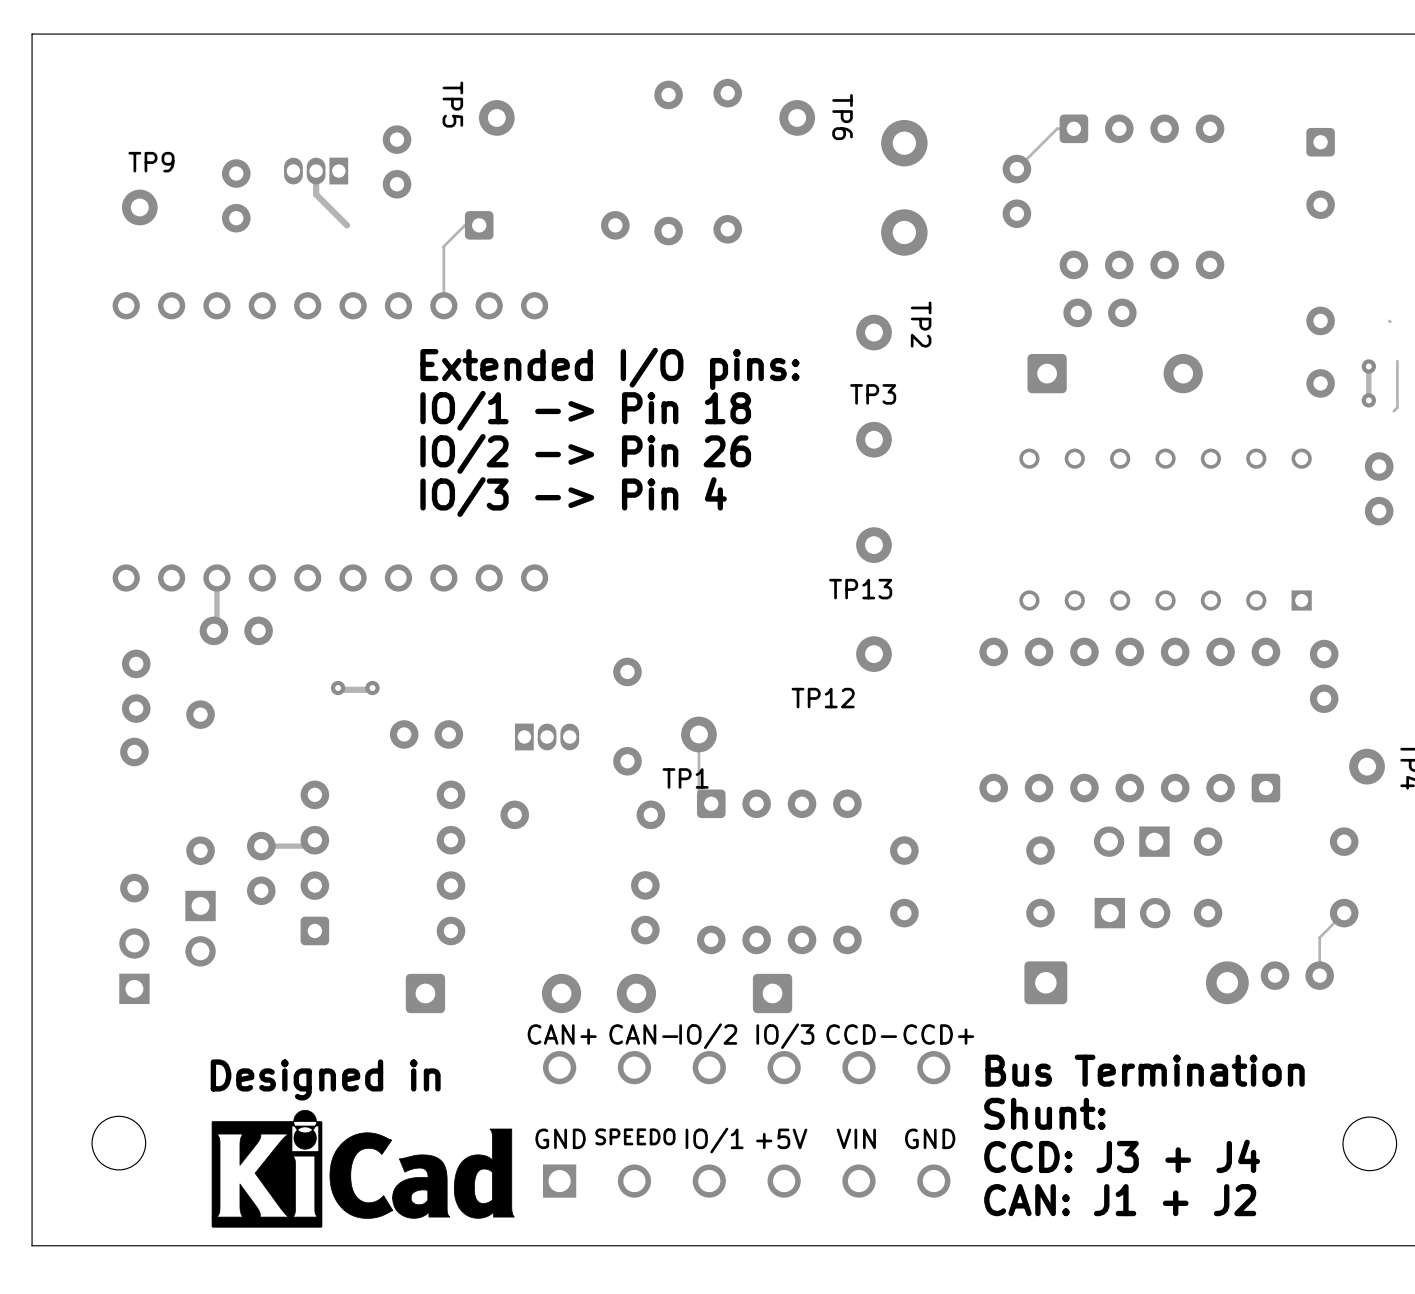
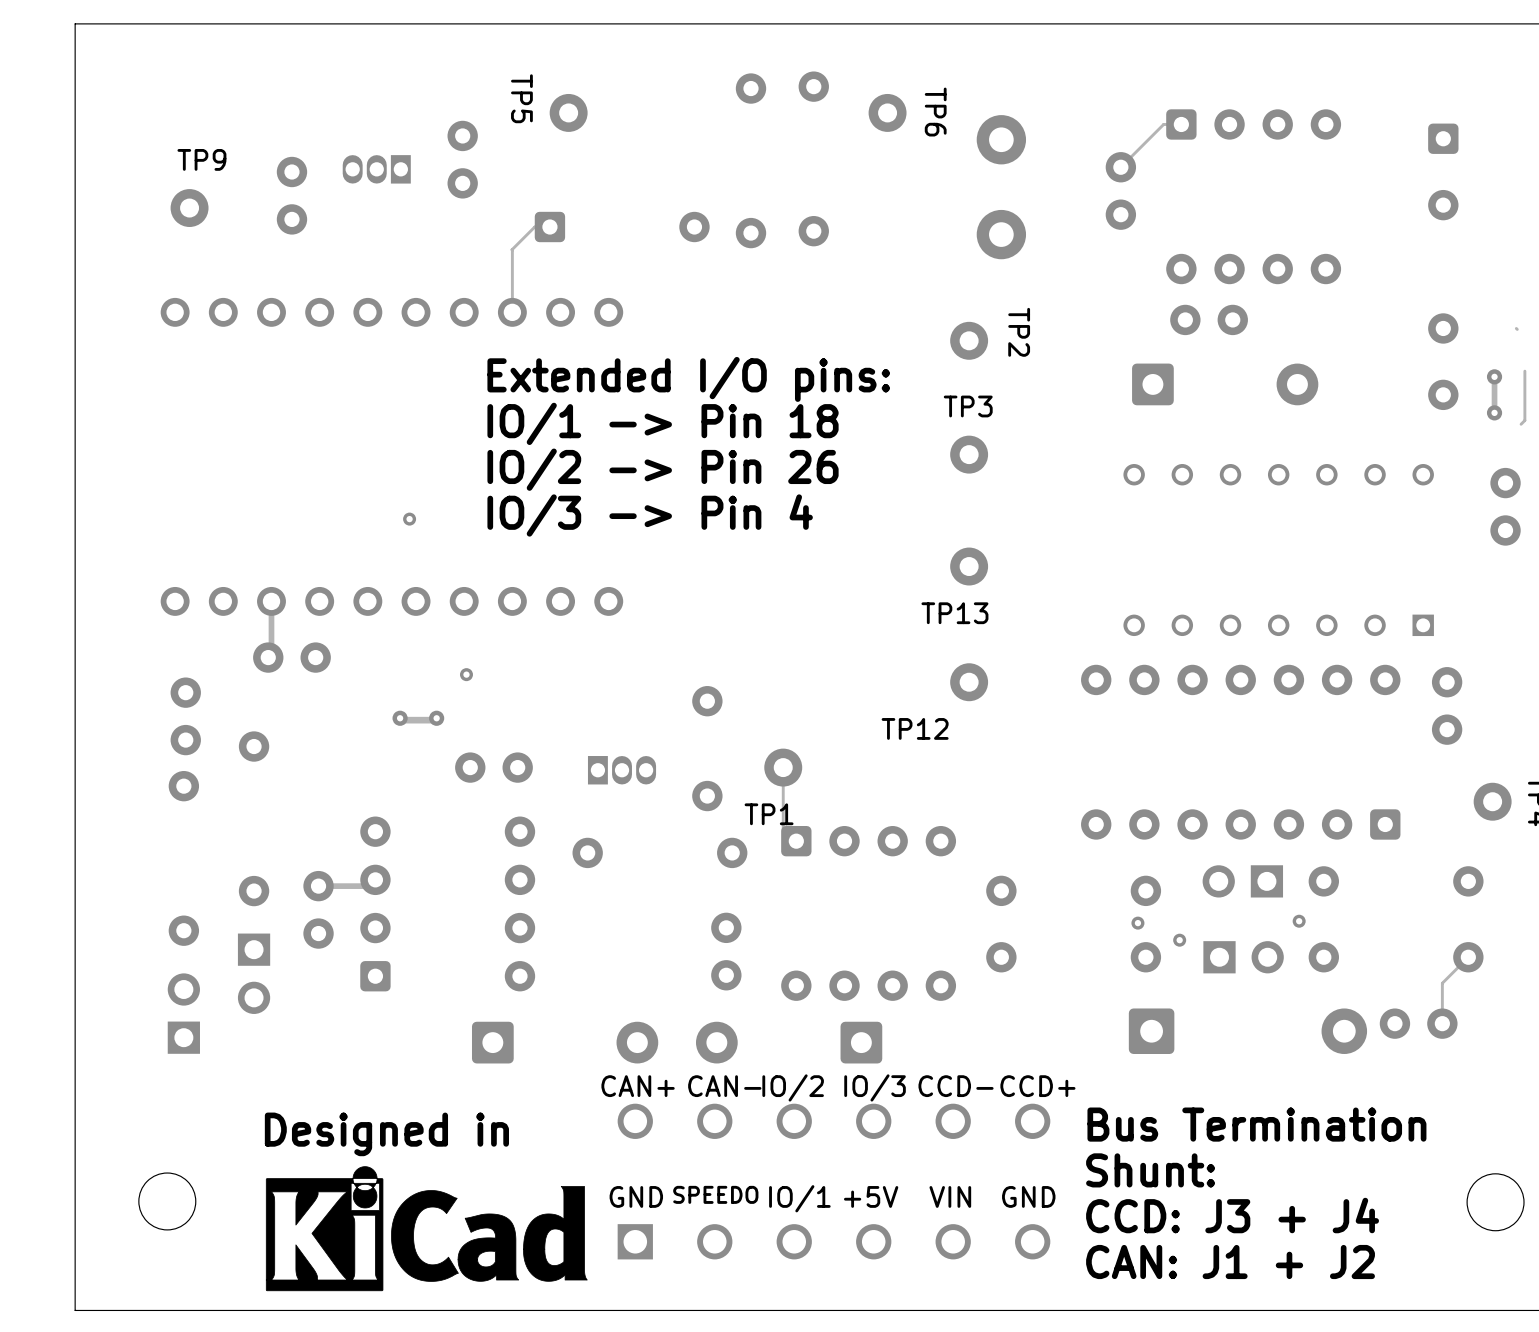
track: (316, 171) (316, 194) (347, 225) -> none
via: none -> (409, 519)
via: none -> (466, 674)
via: none -> (1299, 921)
via: none -> (1137, 923)
via: none -> (1179, 940)

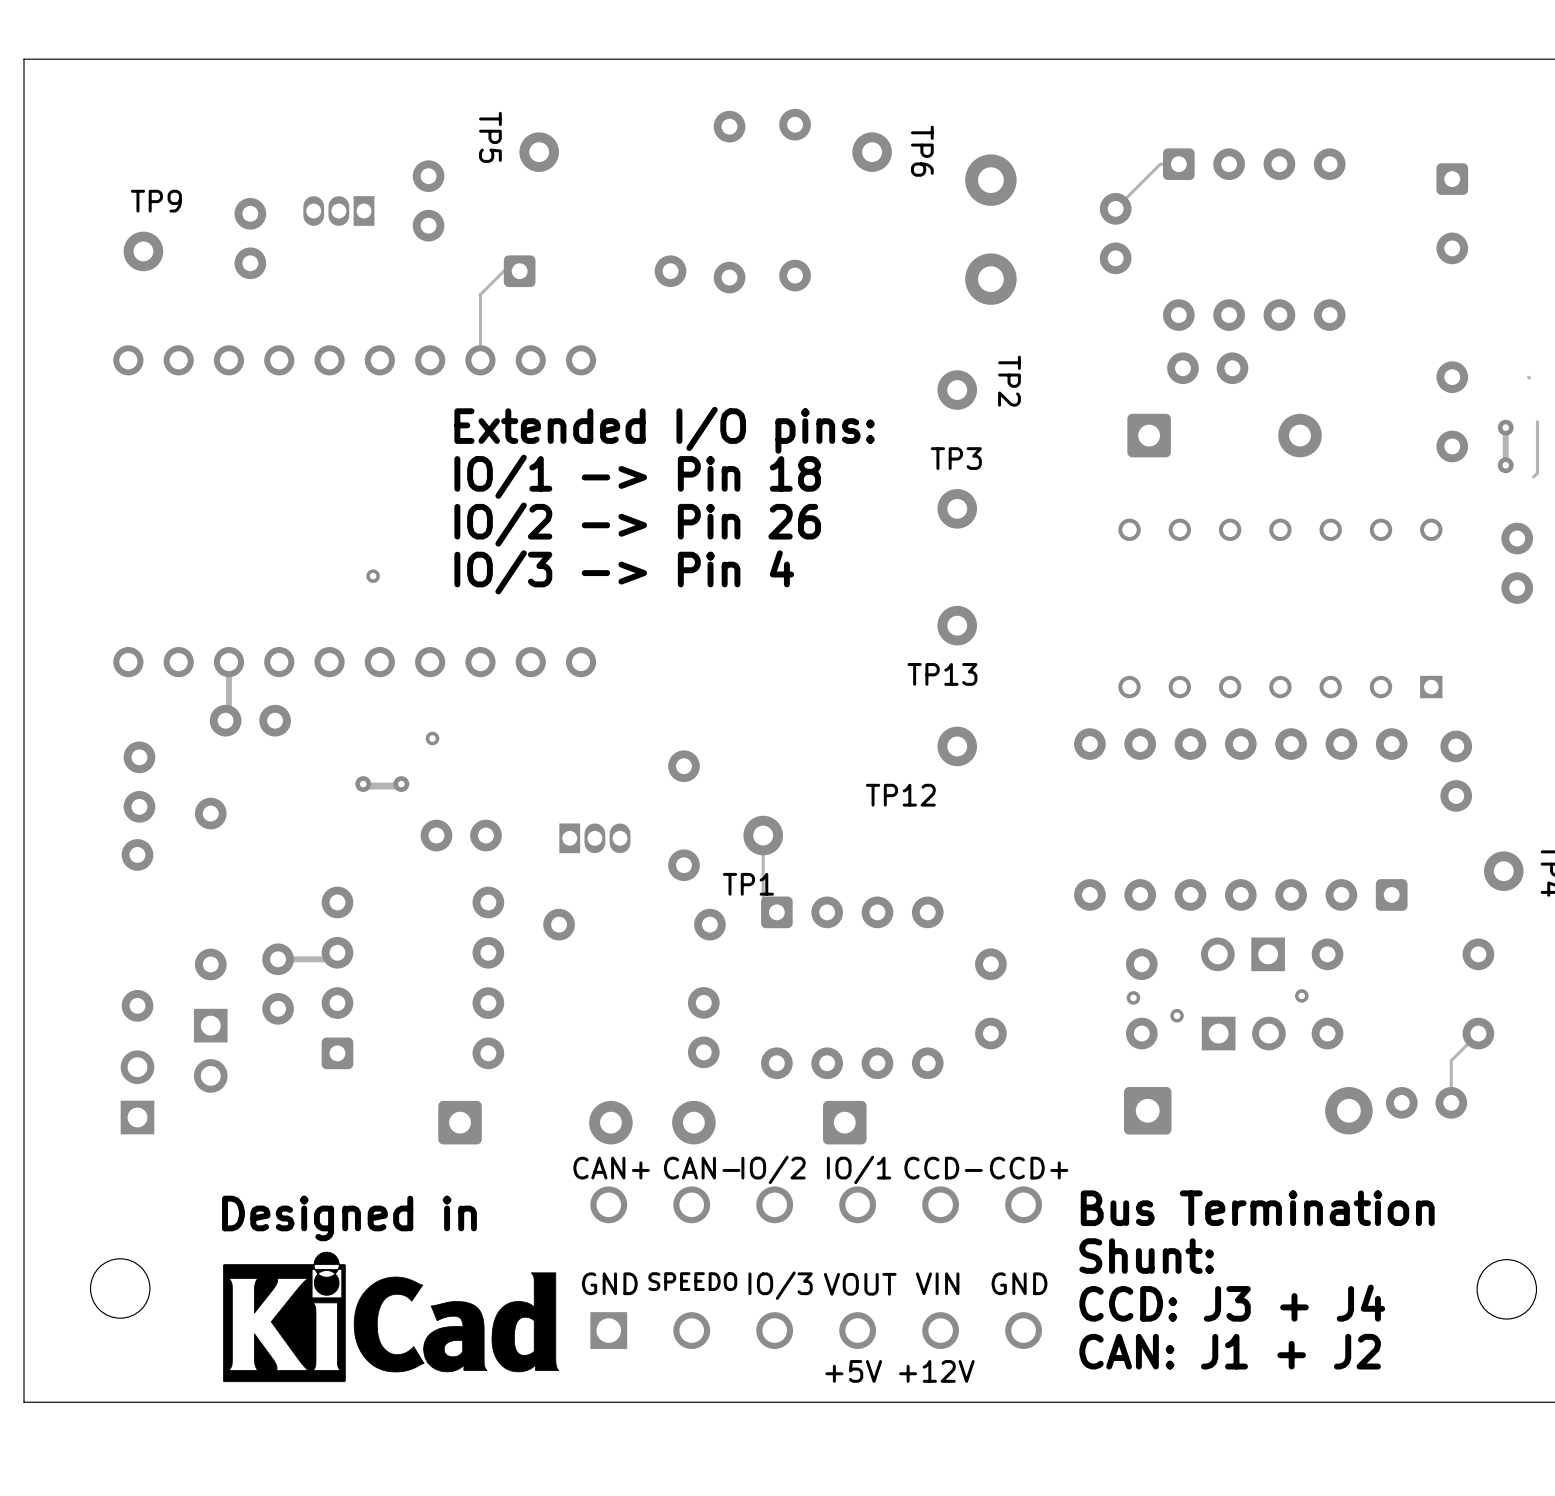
text: IO/3 (875, 1087) -> IO/1 (859, 1169)
text: +5V (871, 1196) -> VOUT (860, 1284)
text: IO/1 (799, 1198) -> IO/3 (780, 1285)
text: none -> +5V (853, 1371)
text: none -> +12V (936, 1371)

